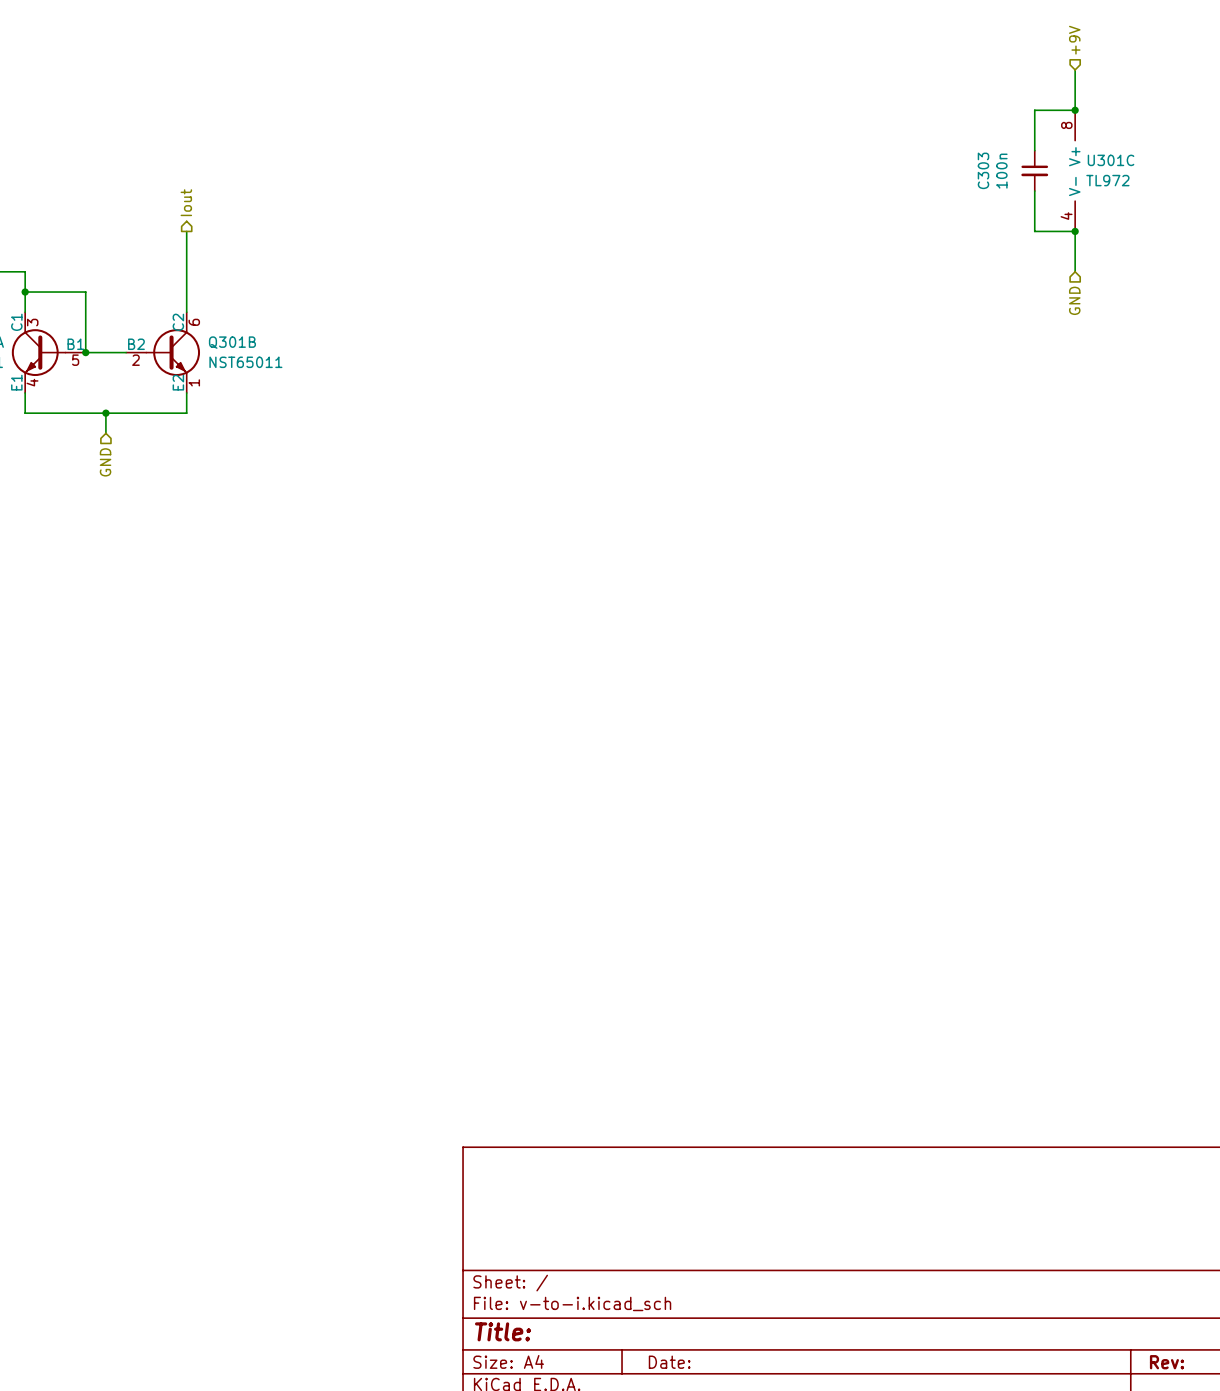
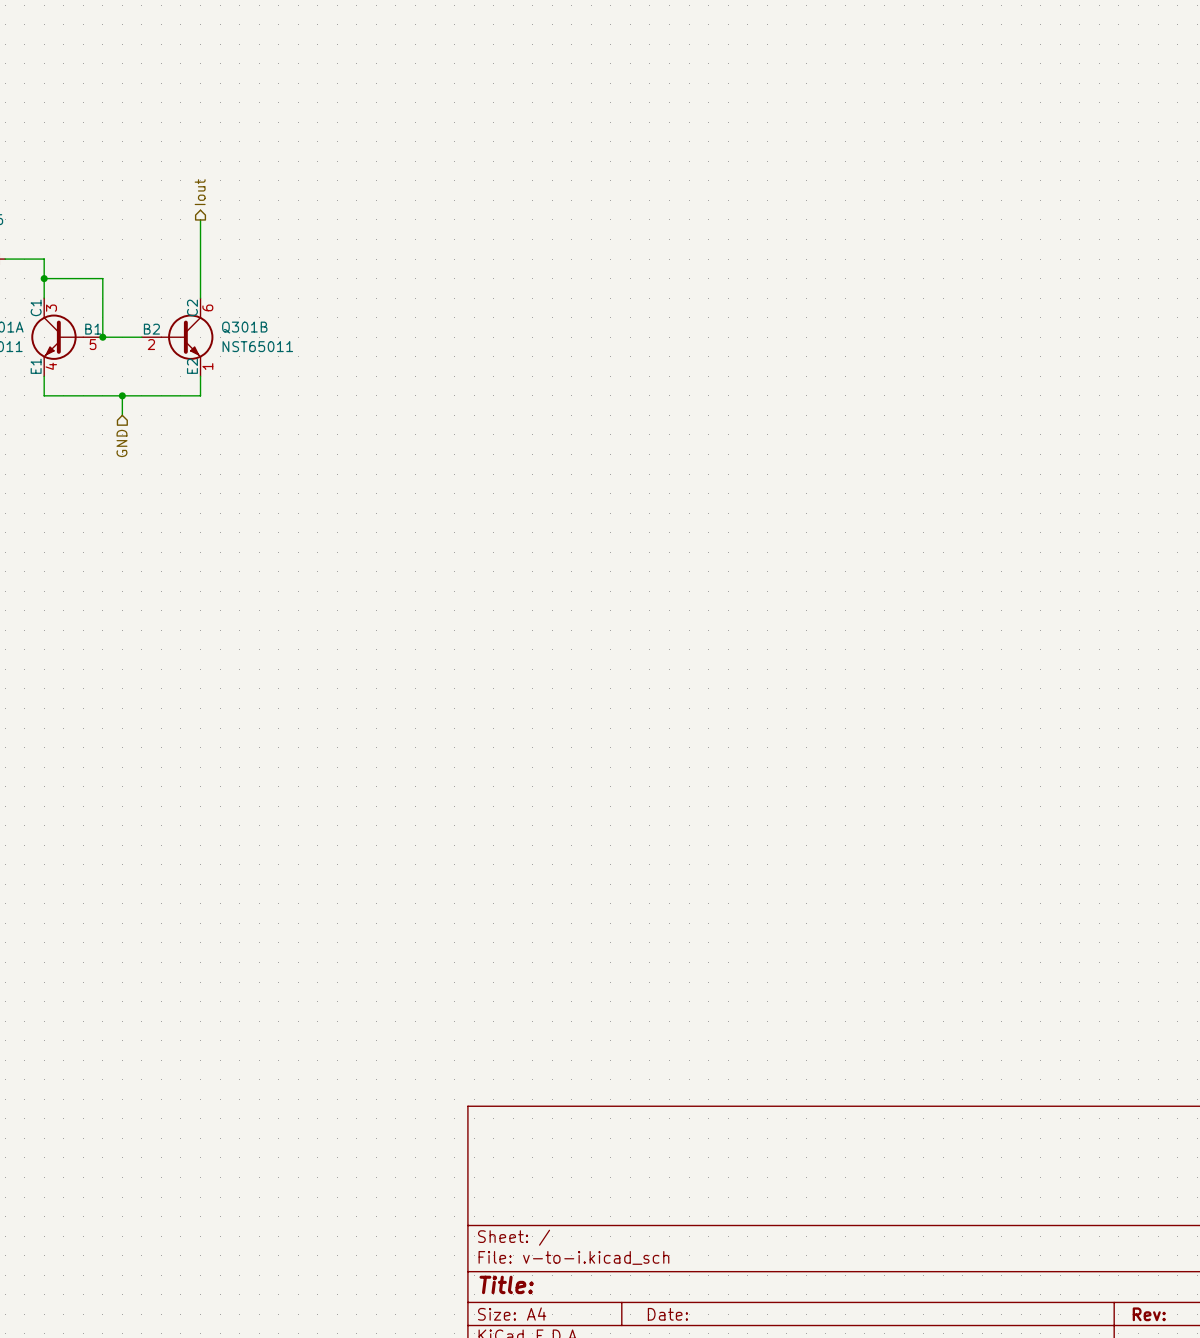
hierarchical label: +9V (1074, 40) -> none
wire: (1075, 69) (1075, 110) (1034, 110) (1034, 150) -> none
junction: (1075, 110) -> none
C303: 100n (1034, 170) -> none
U301C: TL972 (1075, 170) -> none
wire: (1034, 191) (1034, 231) (1075, 231) (1075, 271) -> none
junction: (1075, 231) -> none
hierarchical label: GND (1074, 300) -> none

